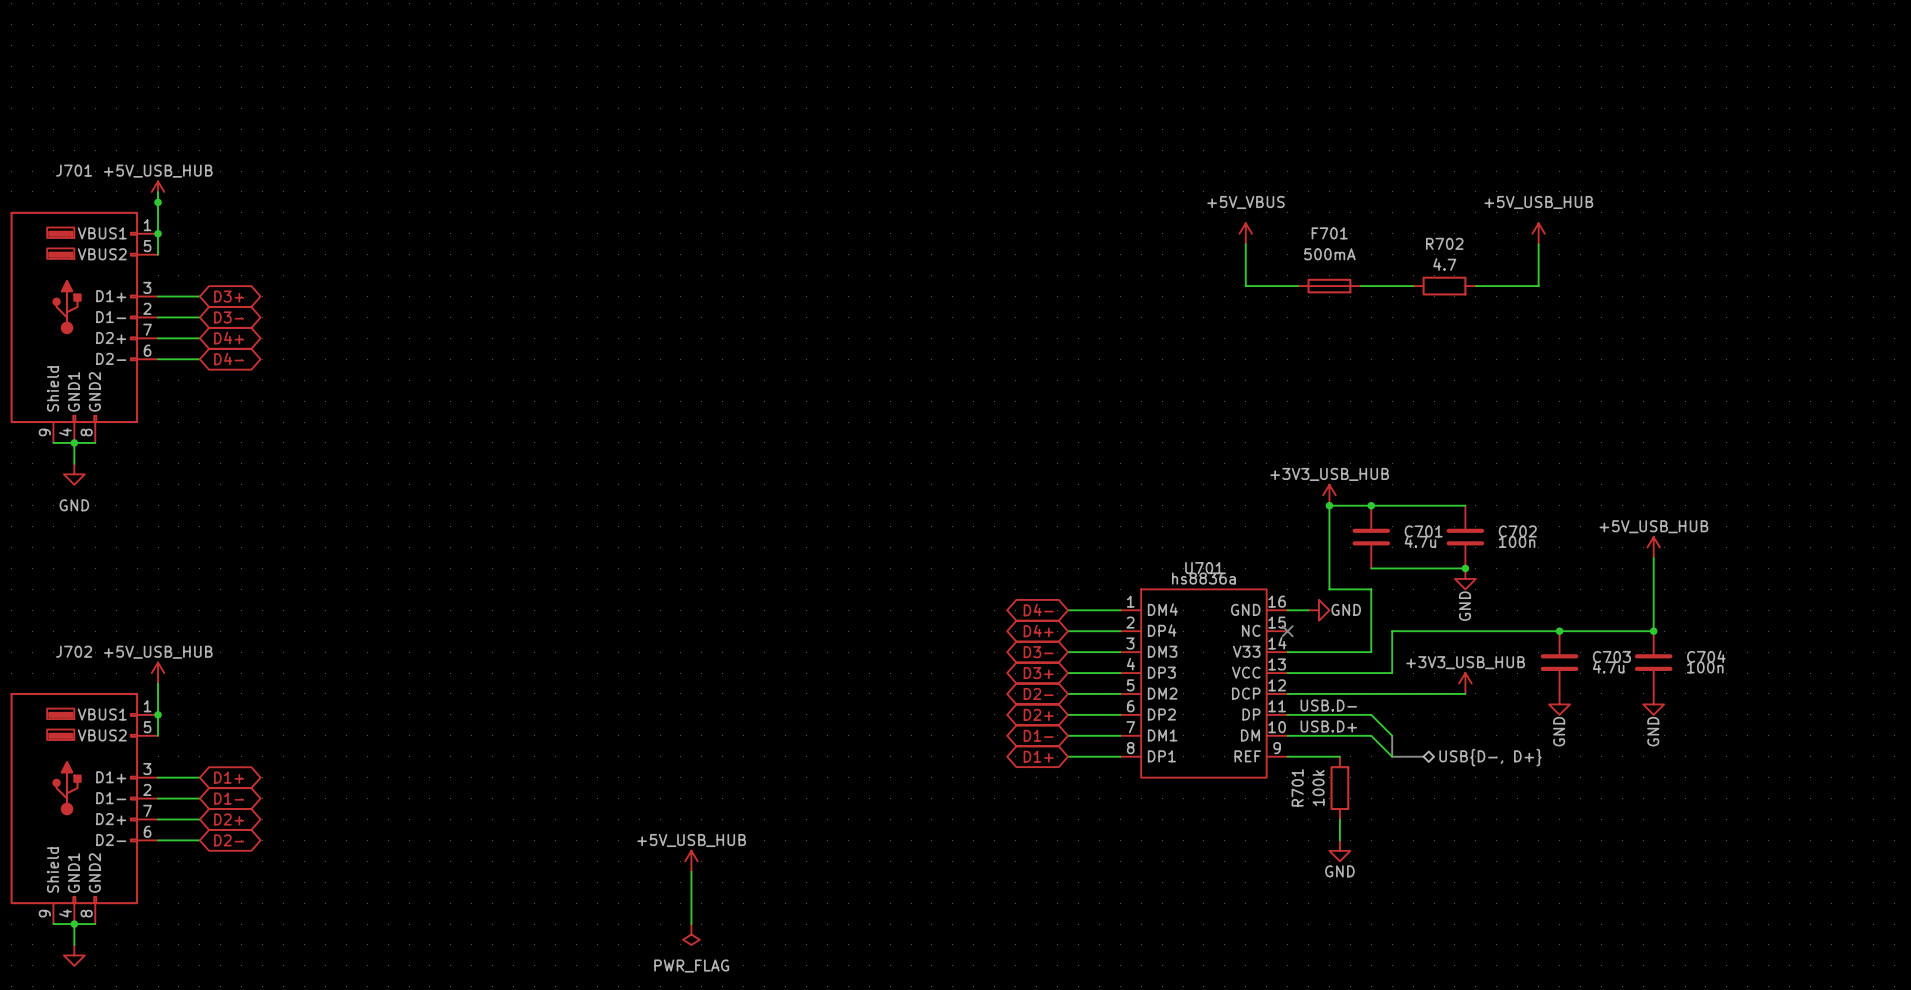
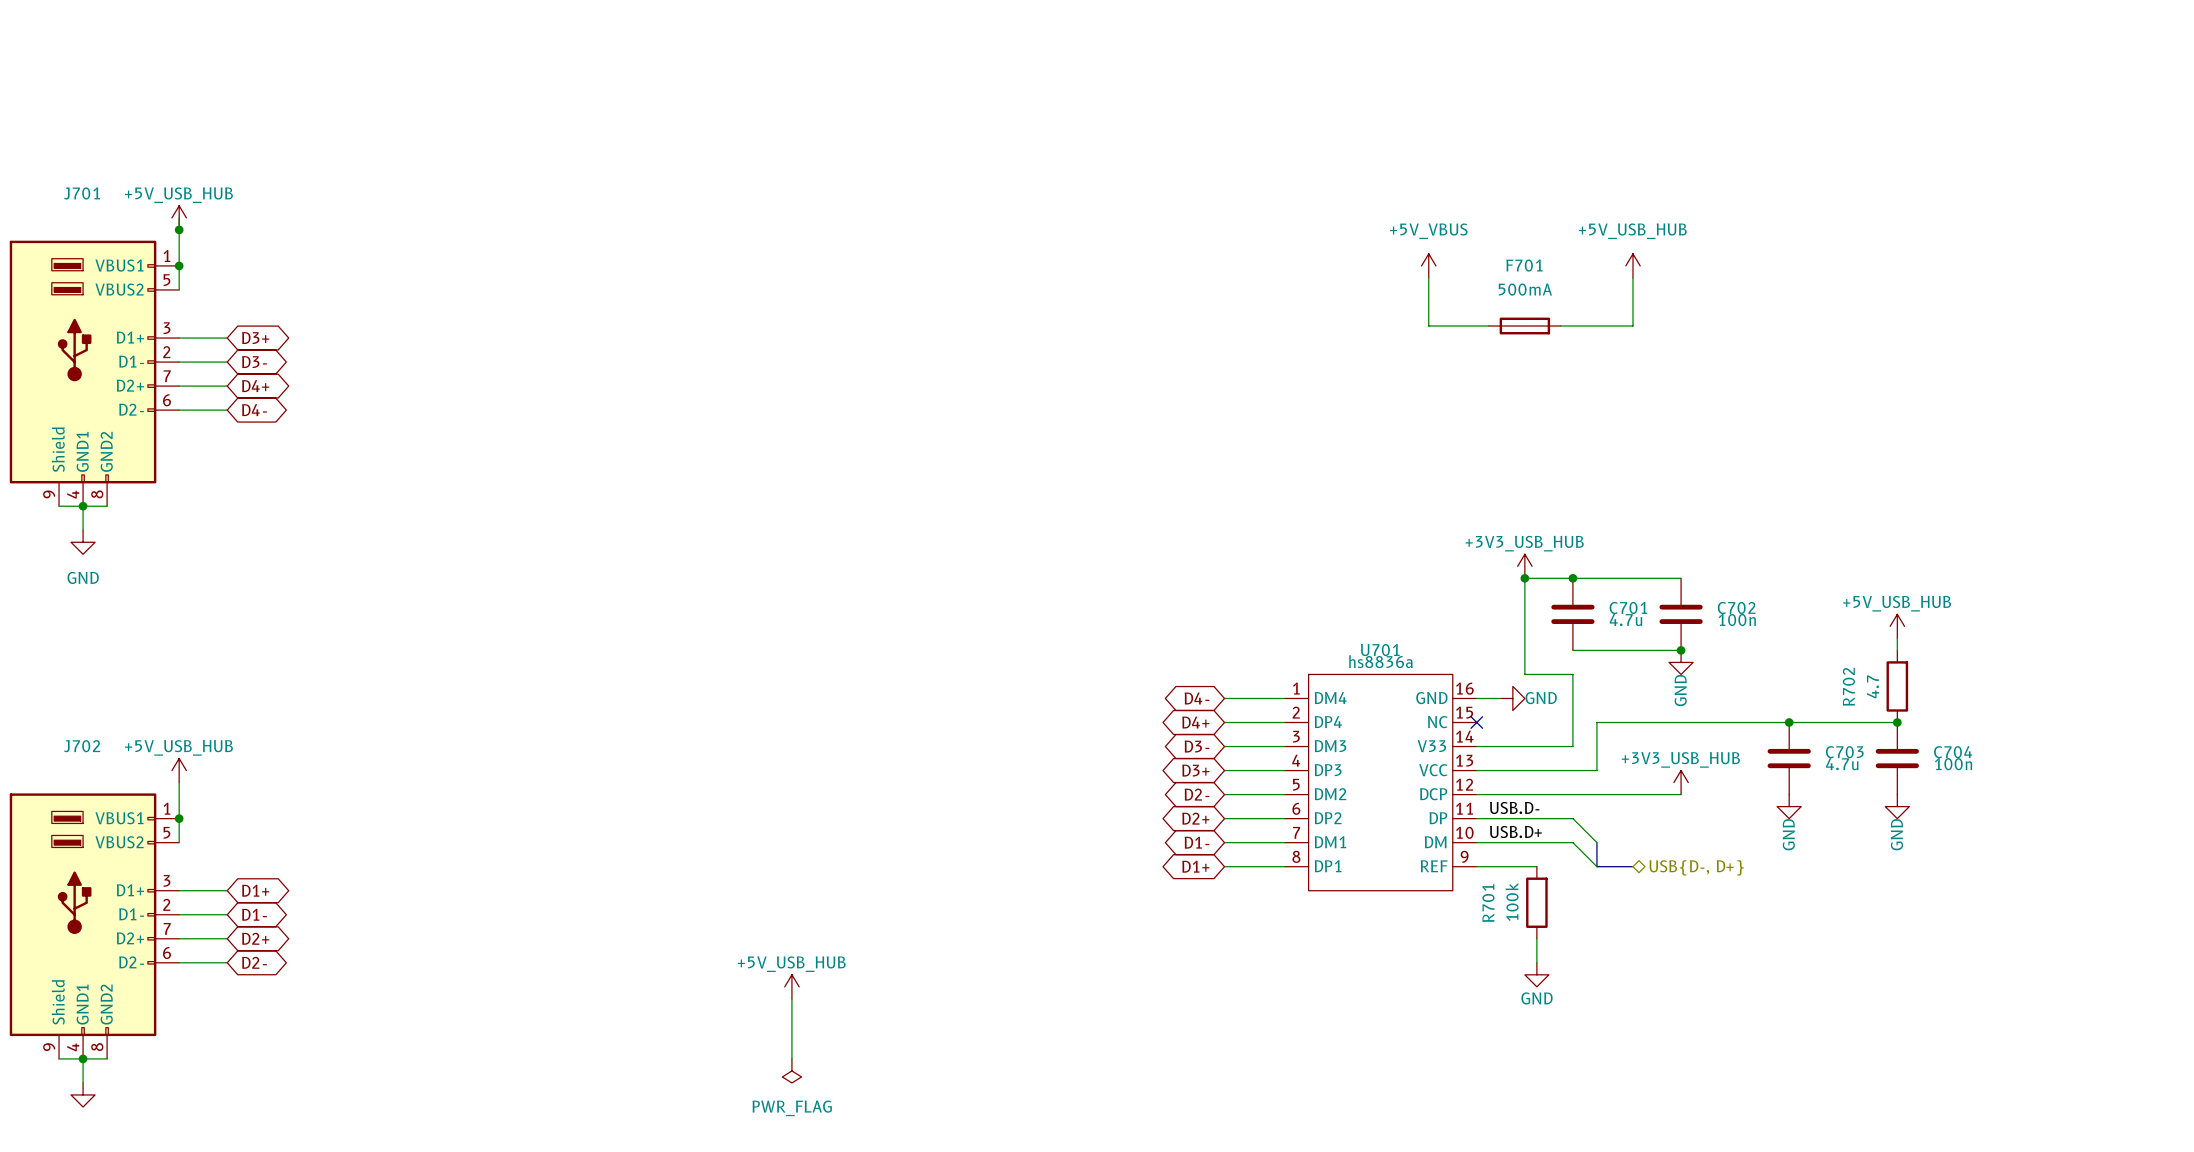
power symbol position: +5V_USB_HUB (1538, 233) -> +5V_USB_HUB (1633, 265)
R702 name position: R702 (1444, 243) -> R702 (1848, 686)
wire: none -> (1633, 277) (1633, 326) (1620, 326)
wire: (1538, 244) (1538, 286) (1475, 286) -> none
R702 value position: 4.7 (1444, 264) -> 4.7 (1872, 686)
R702 rotation: 0° (1444, 286) -> 90° clockwise (1897, 686)
R702 position: (1444, 286) -> (1897, 686)
wire: (1653, 568) (1653, 631) -> none

